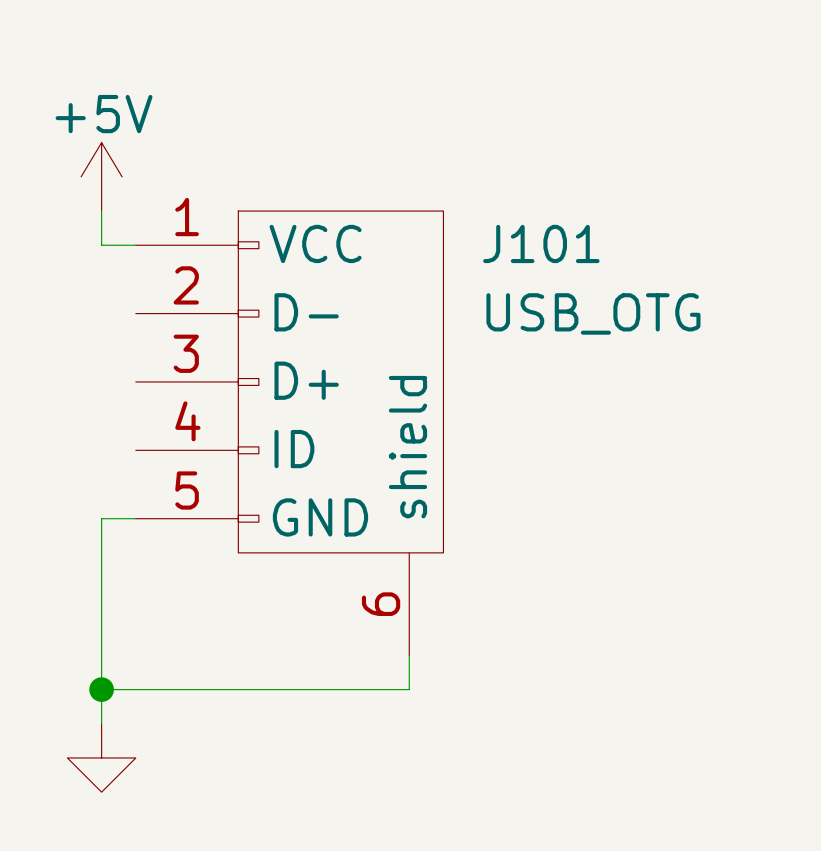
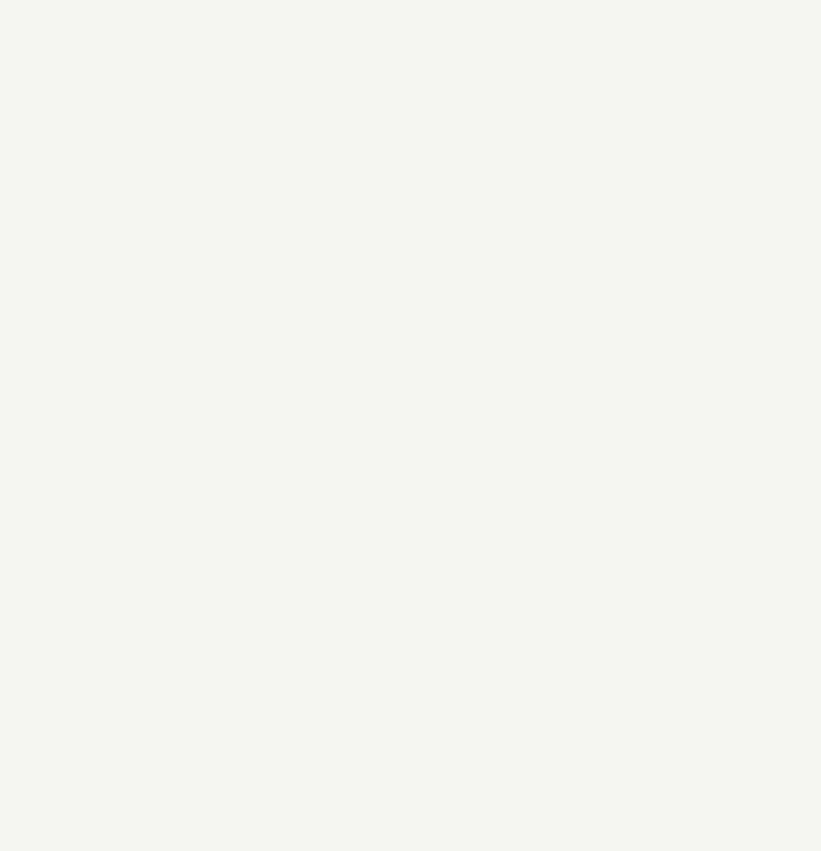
power symbol: +5V (101, 176) -> none
wire: (101, 211) (101, 245) (135, 245) -> none
J101: USB_OTG (289, 433) -> none
wire: (135, 518) (101, 518) (101, 723) -> none
wire: (409, 655) (409, 689) (101, 689) -> none
junction: (101, 689) -> none
power symbol: (101, 757) -> none

